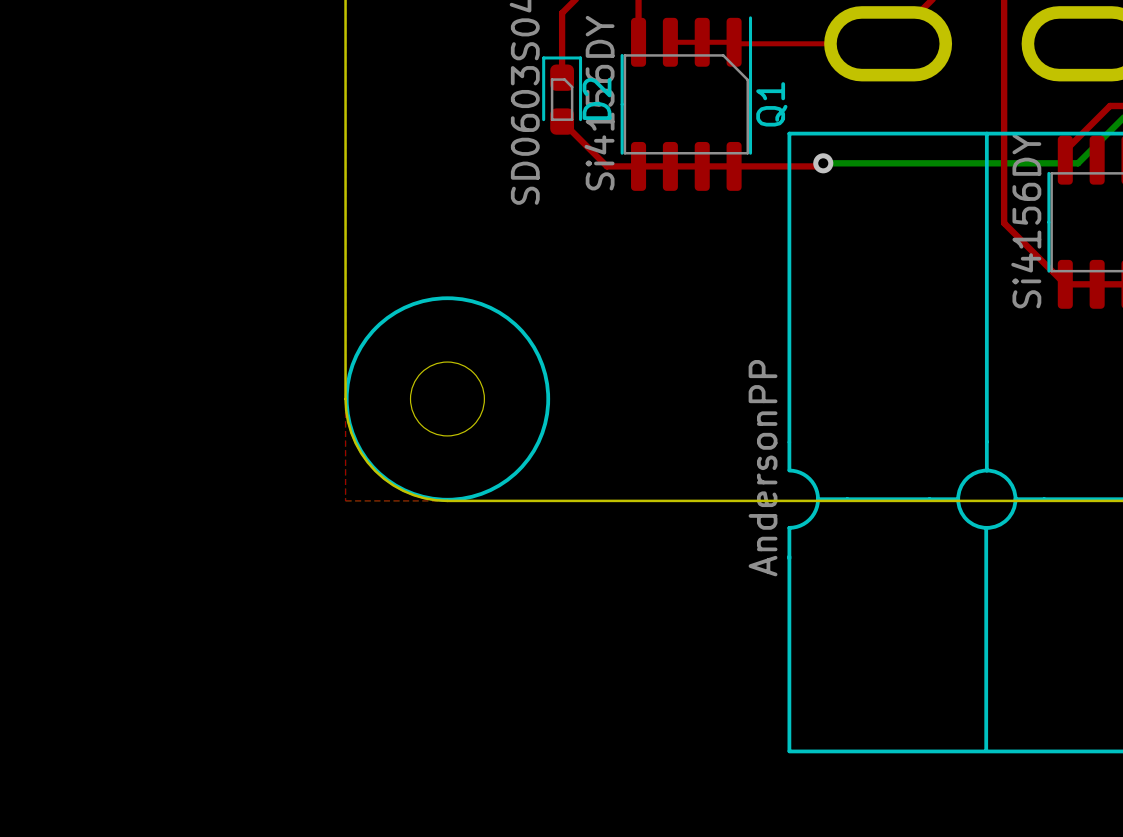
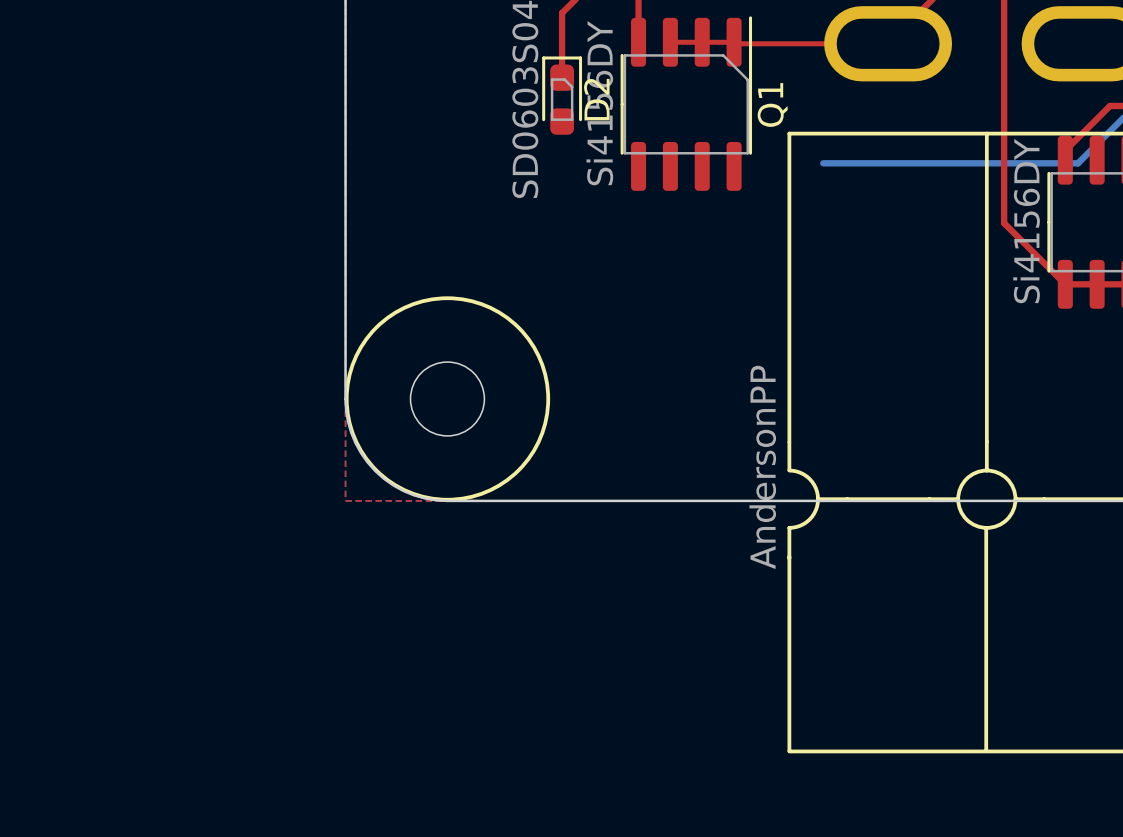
top track: (562, 121) (606, 166) (820, 166) (823, 163) -> none
via: (823, 163) -> none

